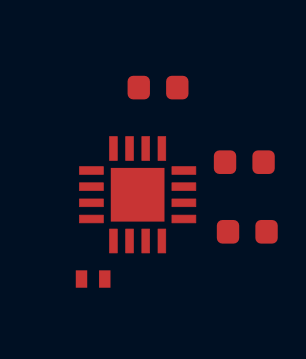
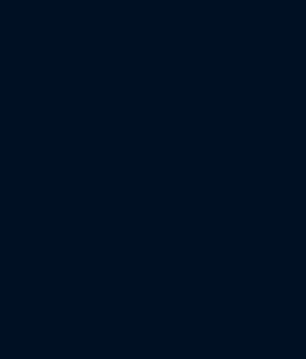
part: (158, 87) -> none
part: (244, 162) -> none
part: (137, 194) -> none
part: (247, 231) -> none
part: (93, 279) -> none

